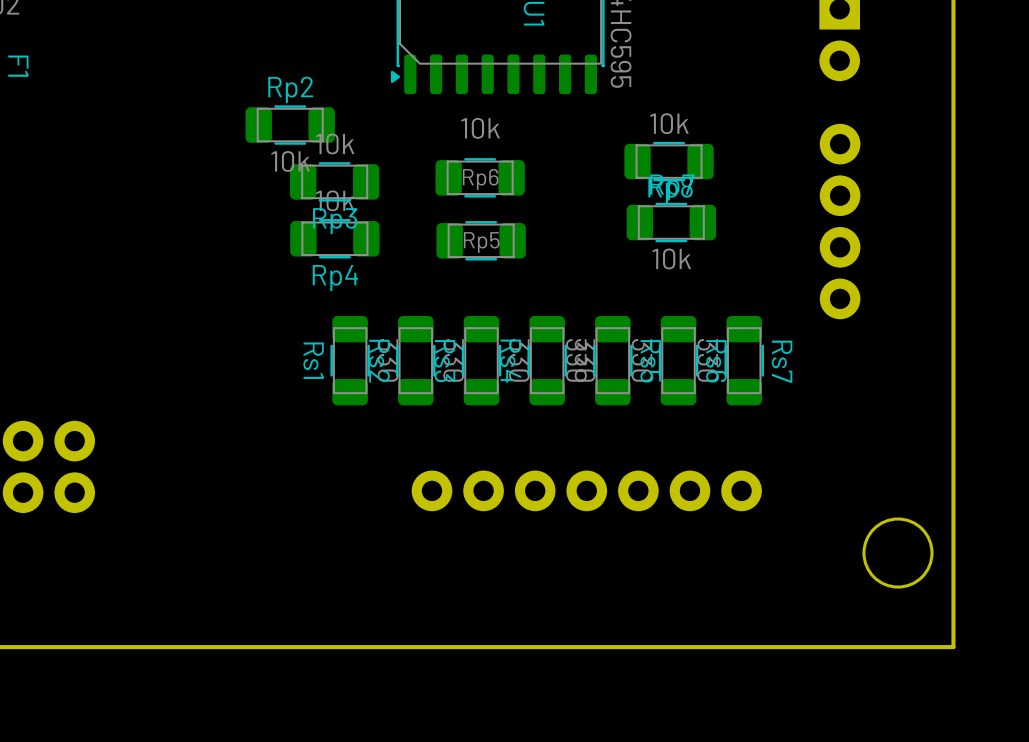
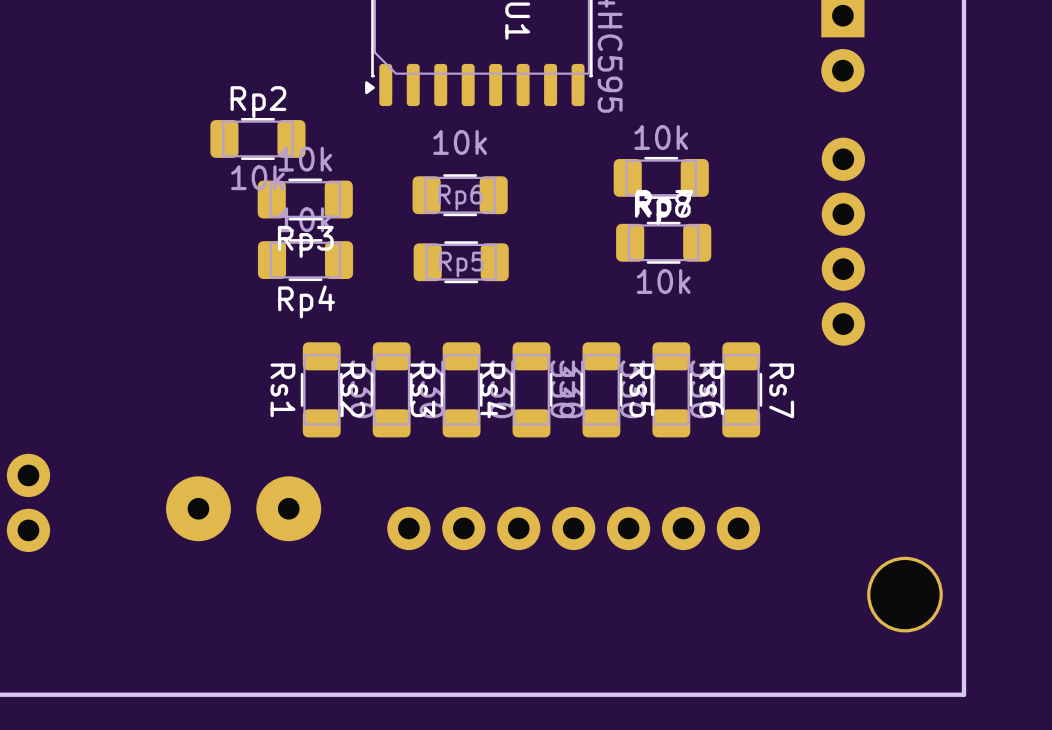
part: none -> (198, 508)
part: none -> (288, 508)

